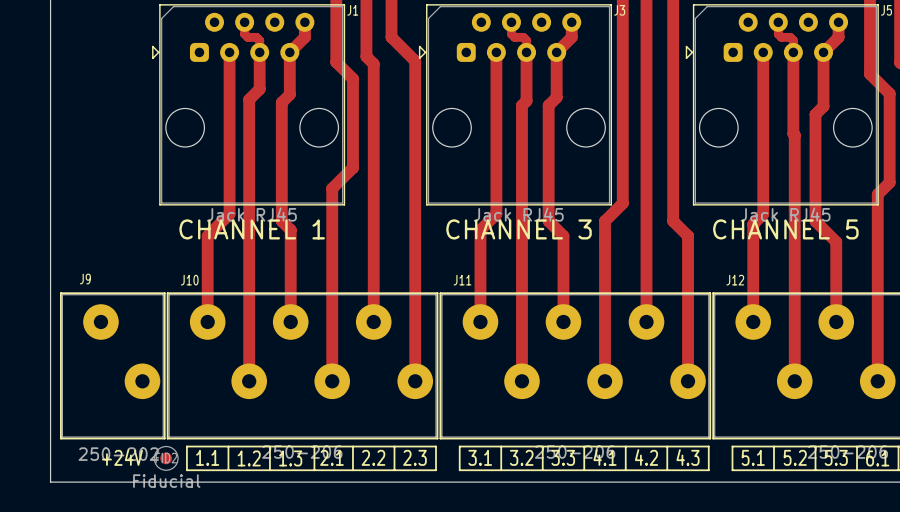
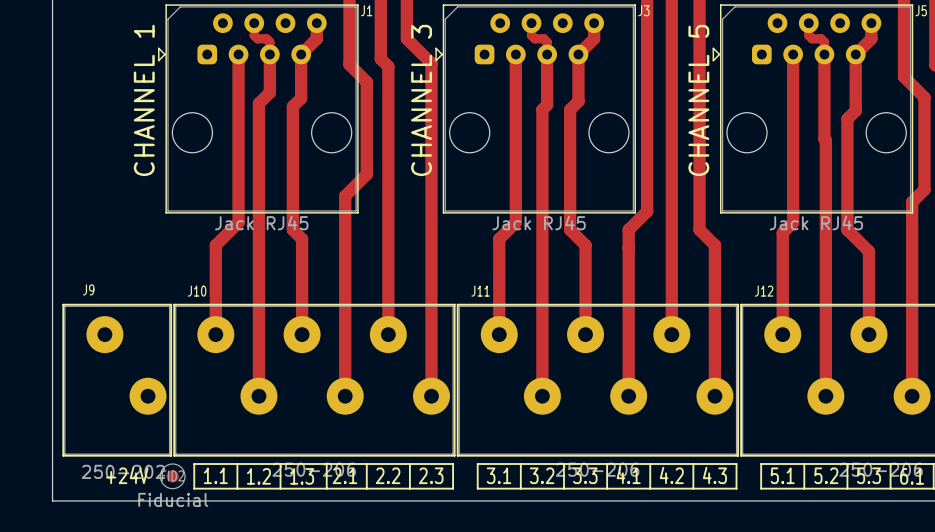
text rotation: 0° (252, 229) -> 90° counterclockwise (144, 100)
text position: CHANNEL 1 (252, 229) -> CHANNEL 1 (144, 100)
text rotation: 0° (519, 229) -> 90° counterclockwise (421, 100)
text position: CHANNEL 3 (519, 229) -> CHANNEL 3 (421, 100)
text rotation: 0° (785, 229) -> 90° counterclockwise (698, 100)
text position: CHANNEL 5 (785, 229) -> CHANNEL 5 (698, 100)

